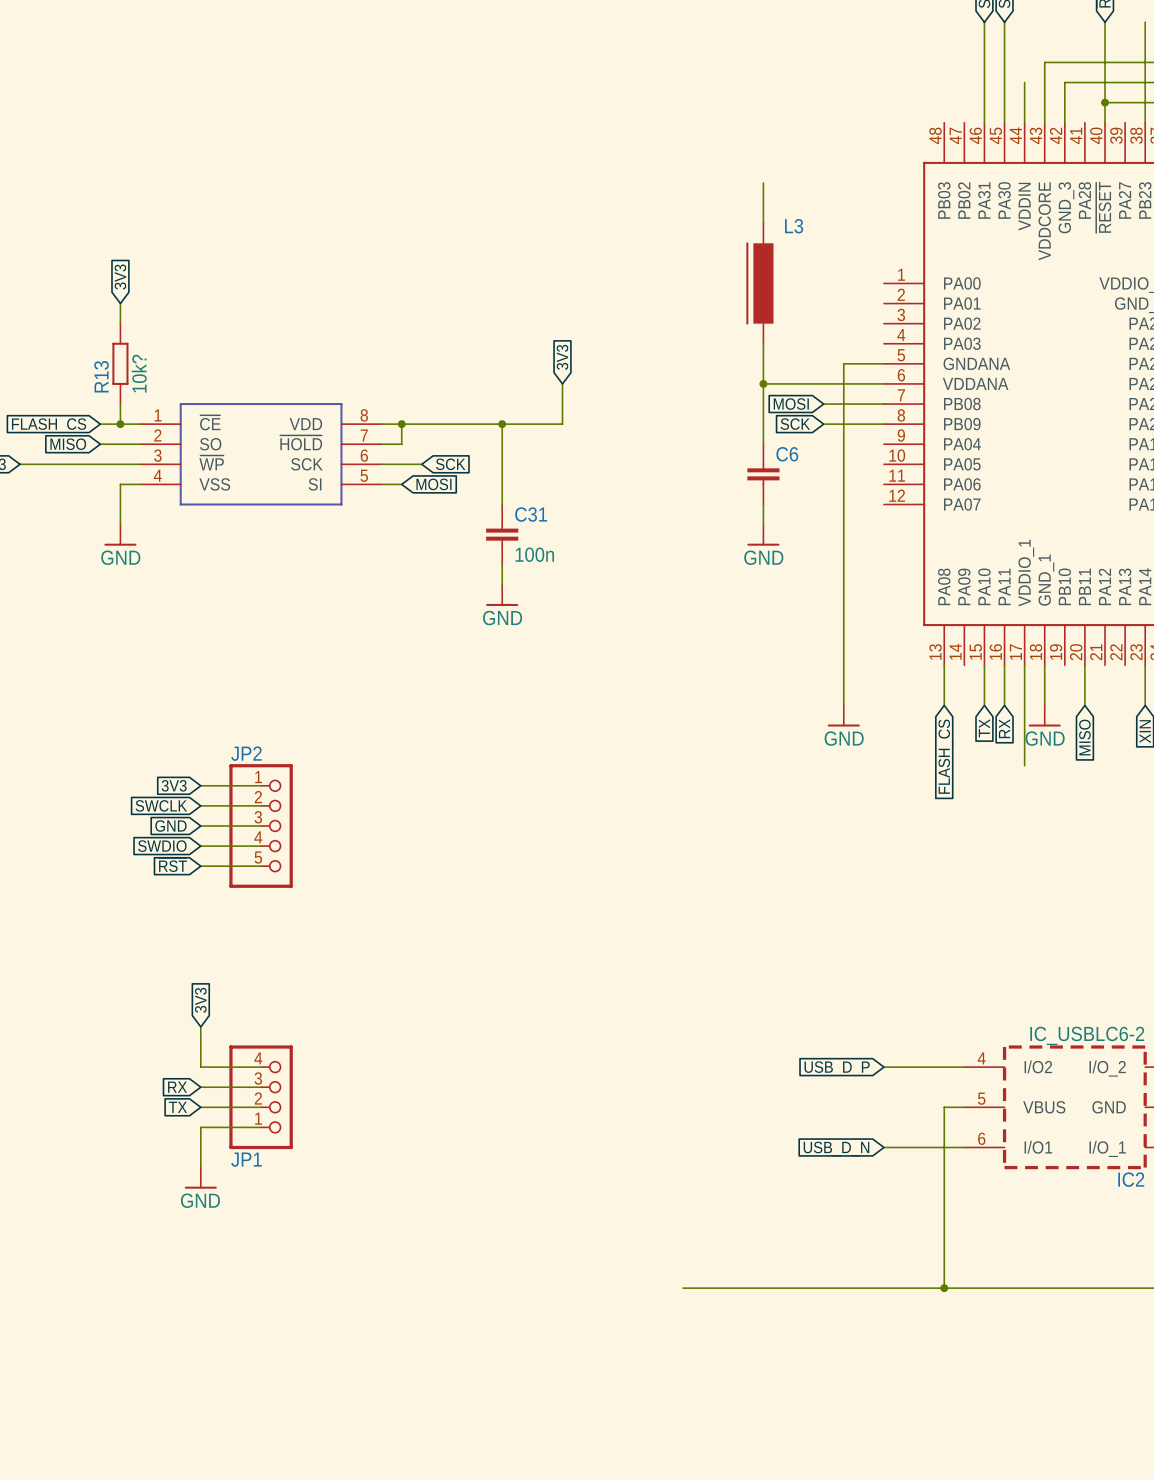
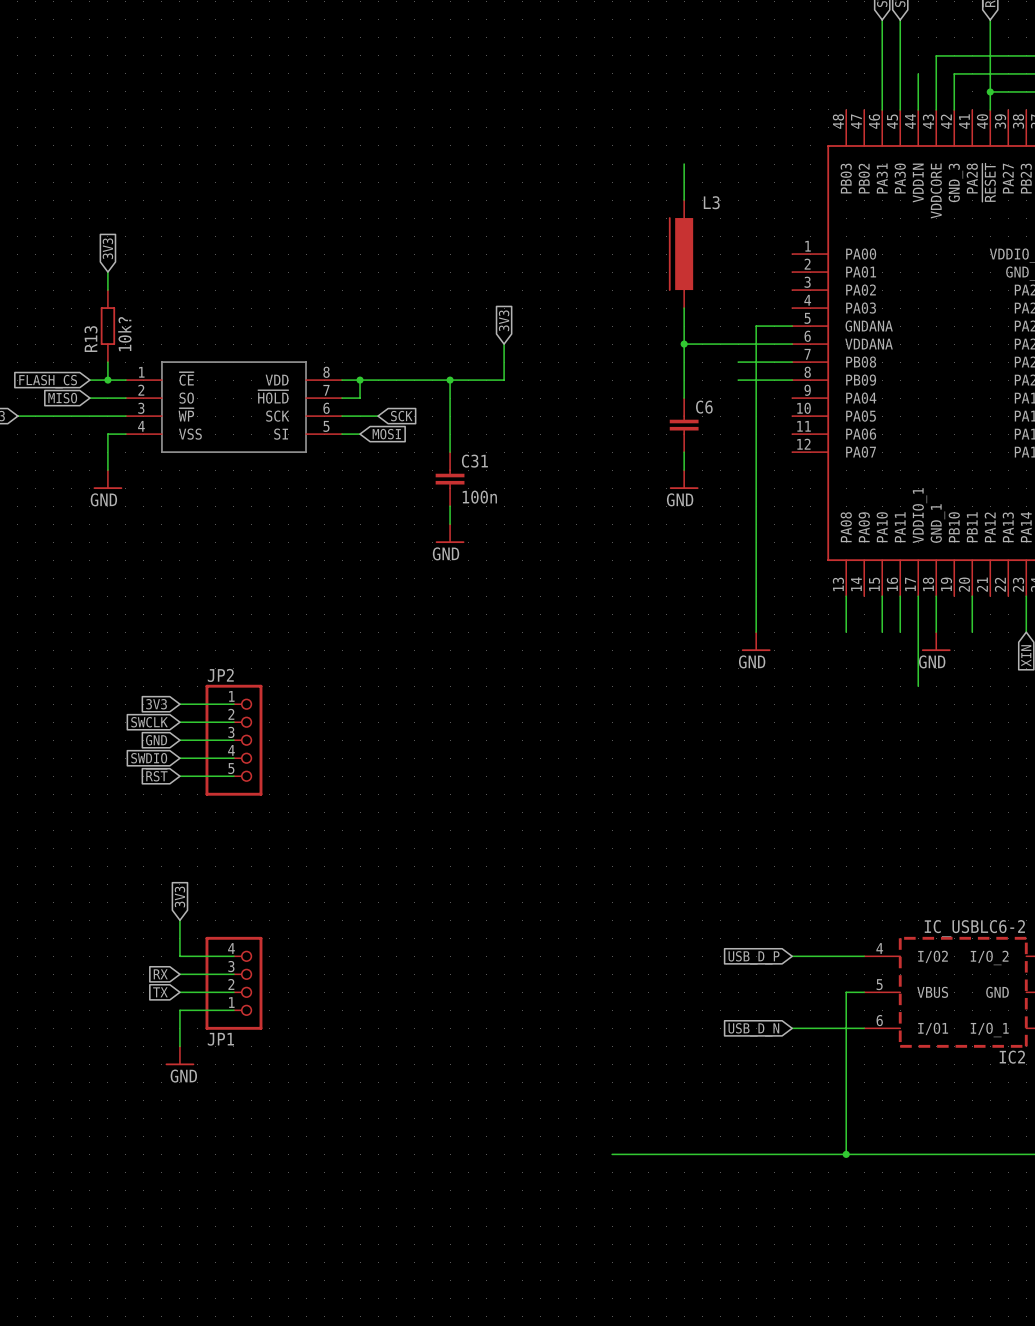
wire: (1145, 22) (1145, 122) -> none
global label: MOSI (791, 404) -> none
global label: SCK (795, 424) -> none
global label: TX (984, 728) -> none
global label: RX (1004, 728) -> none
global label: MISO (1084, 737) -> none
global label: FLASH_CS (945, 756) -> none

